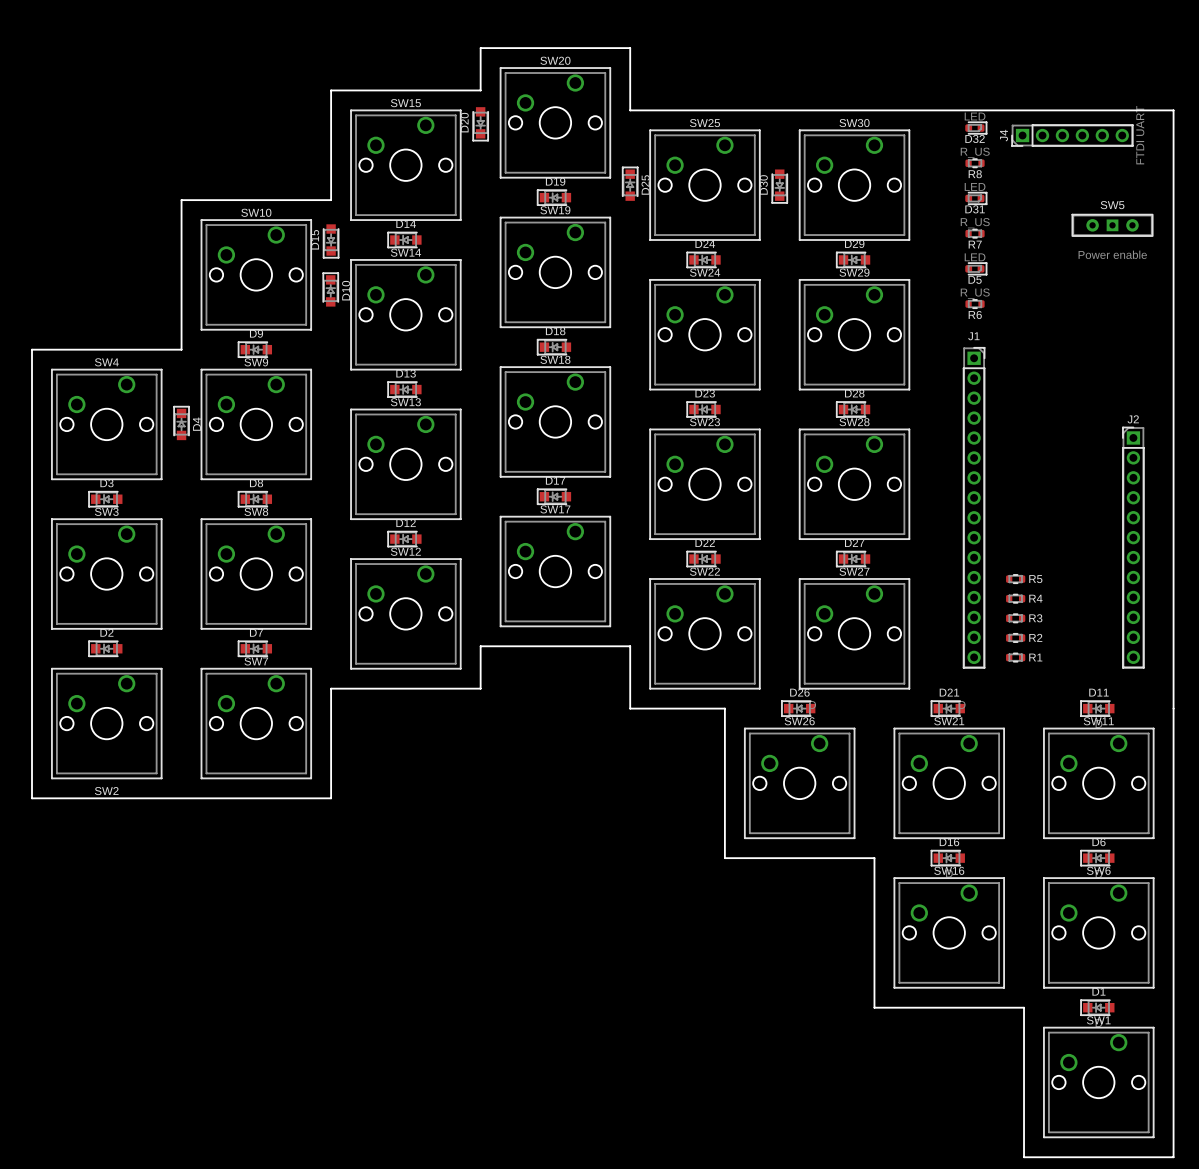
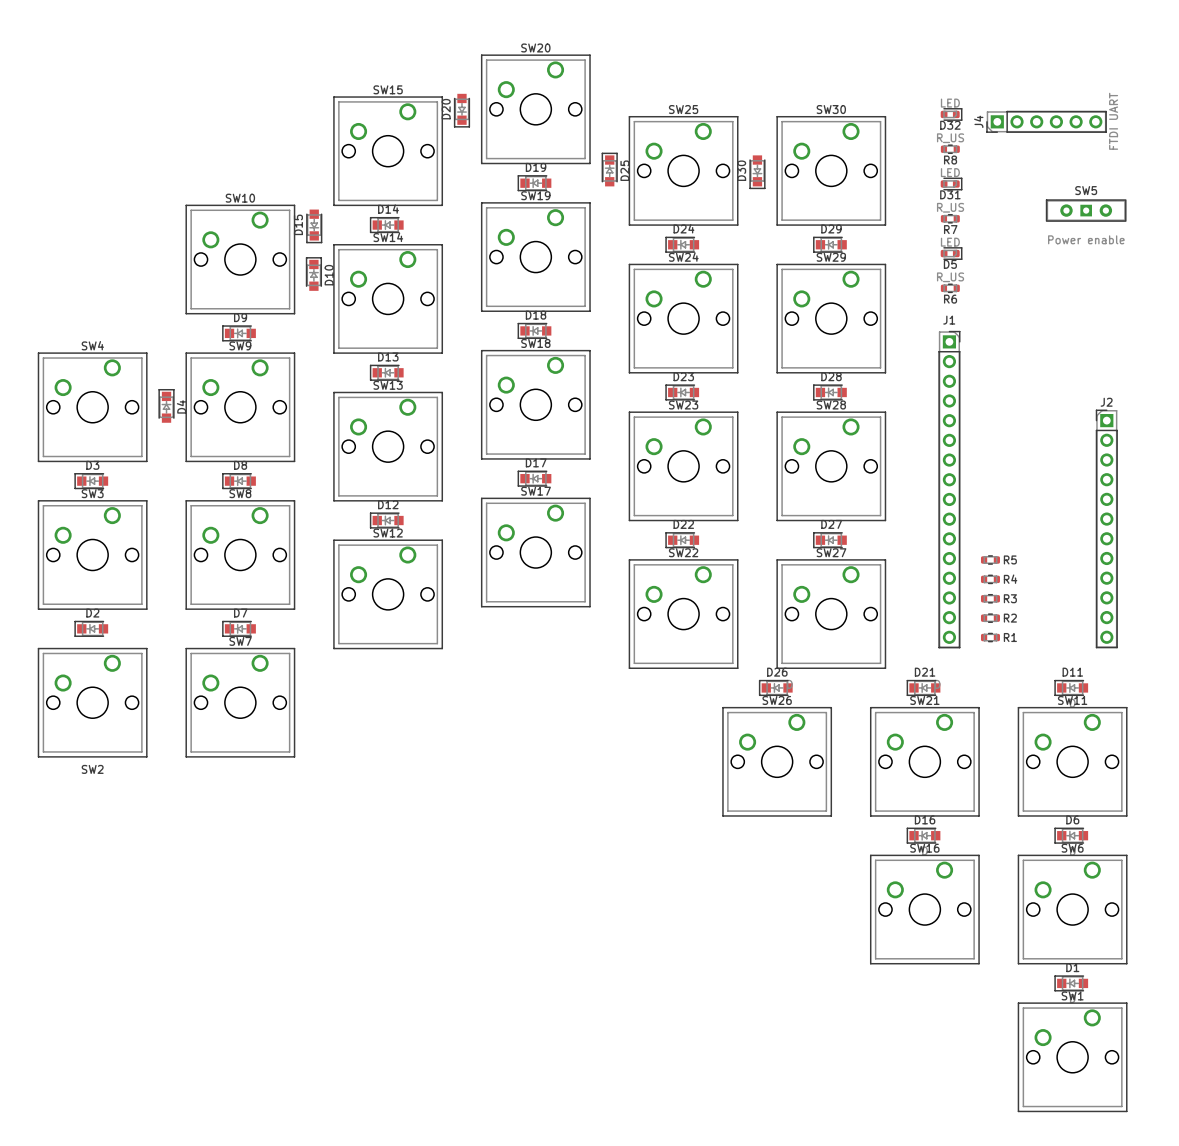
board edge: (480, 48) (480, 90) (331, 90) (331, 200) (181, 200) (181, 349) (31, 349) (31, 798) (331, 798) (331, 688) (480, 688) (480, 646) (630, 646) (630, 708) (724, 708) (724, 858) (874, 858) (874, 1007) (1024, 1007) (1024, 1157) (1173, 1157) (1173, 110) (630, 110) (630, 48) (480, 48) -> none

